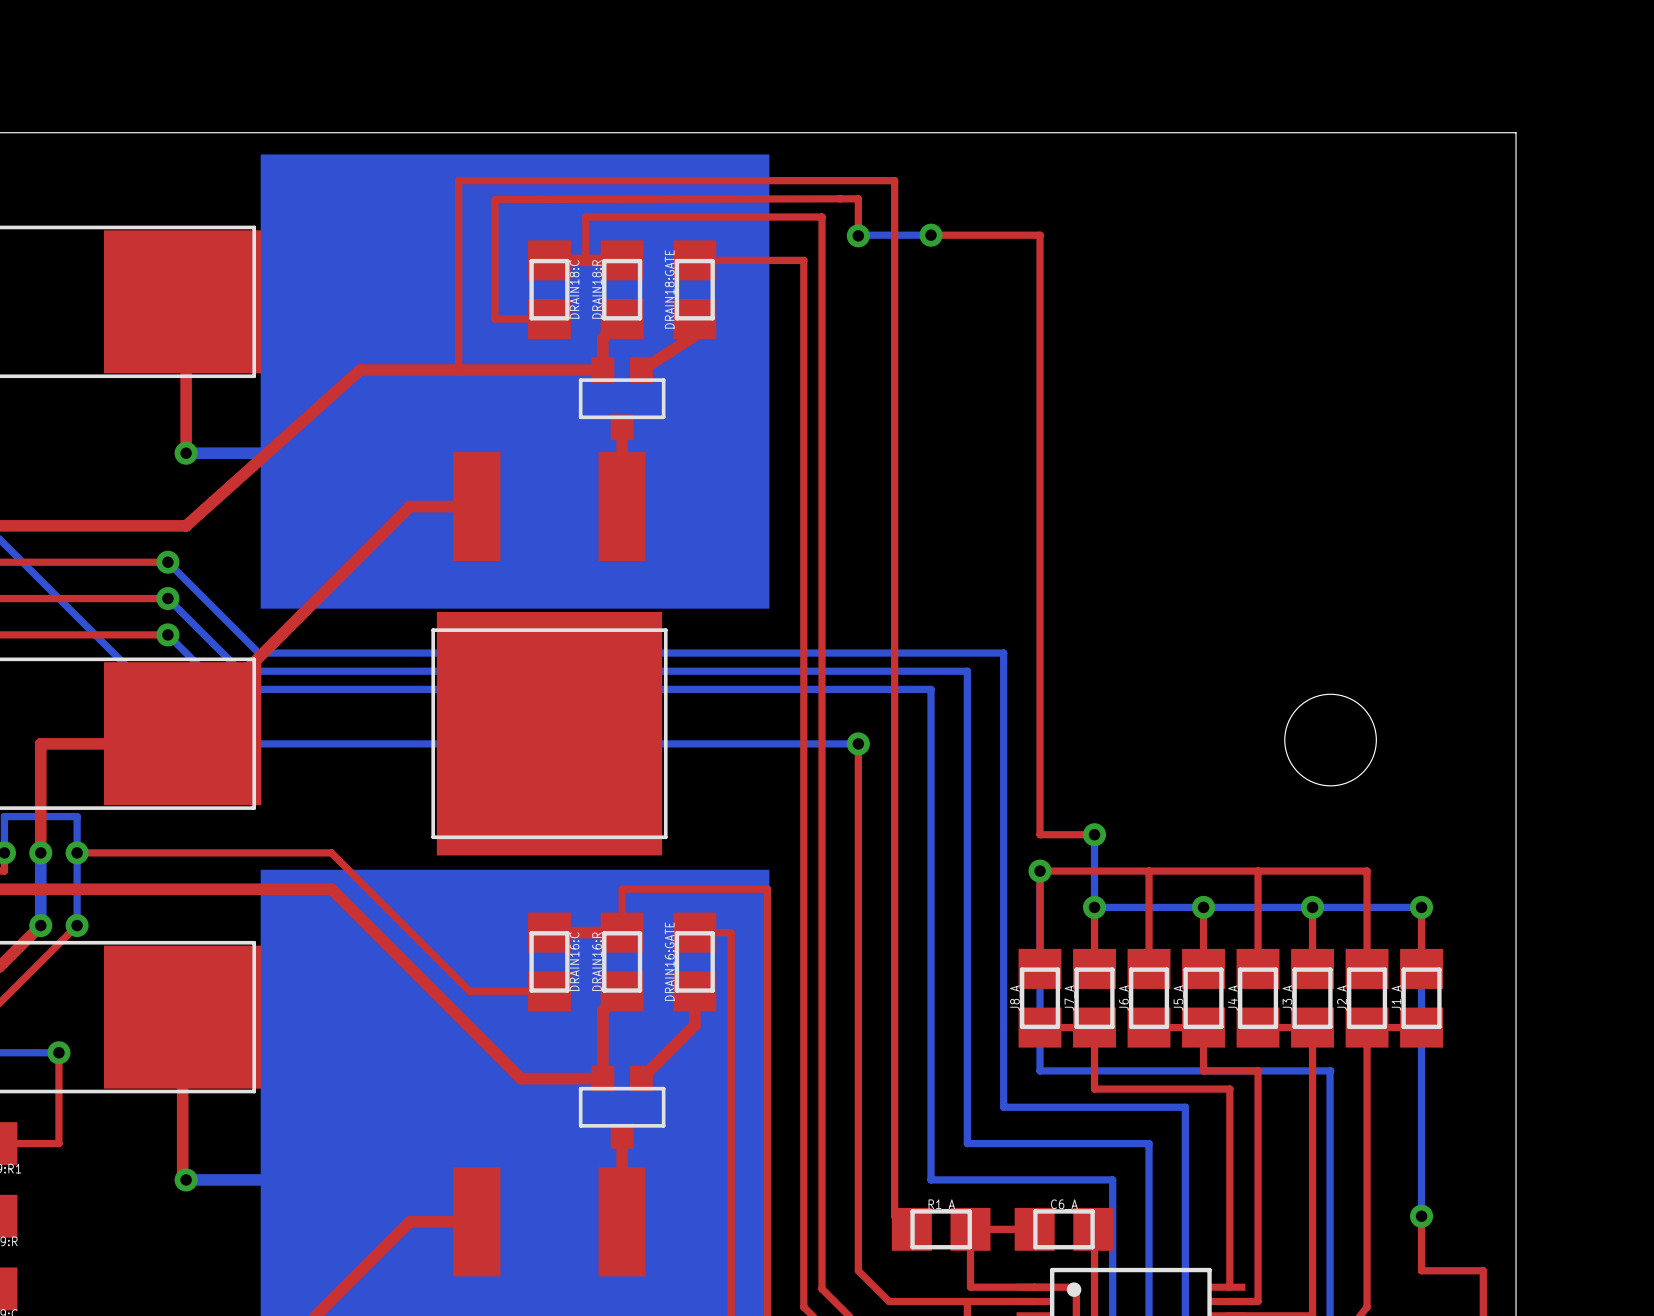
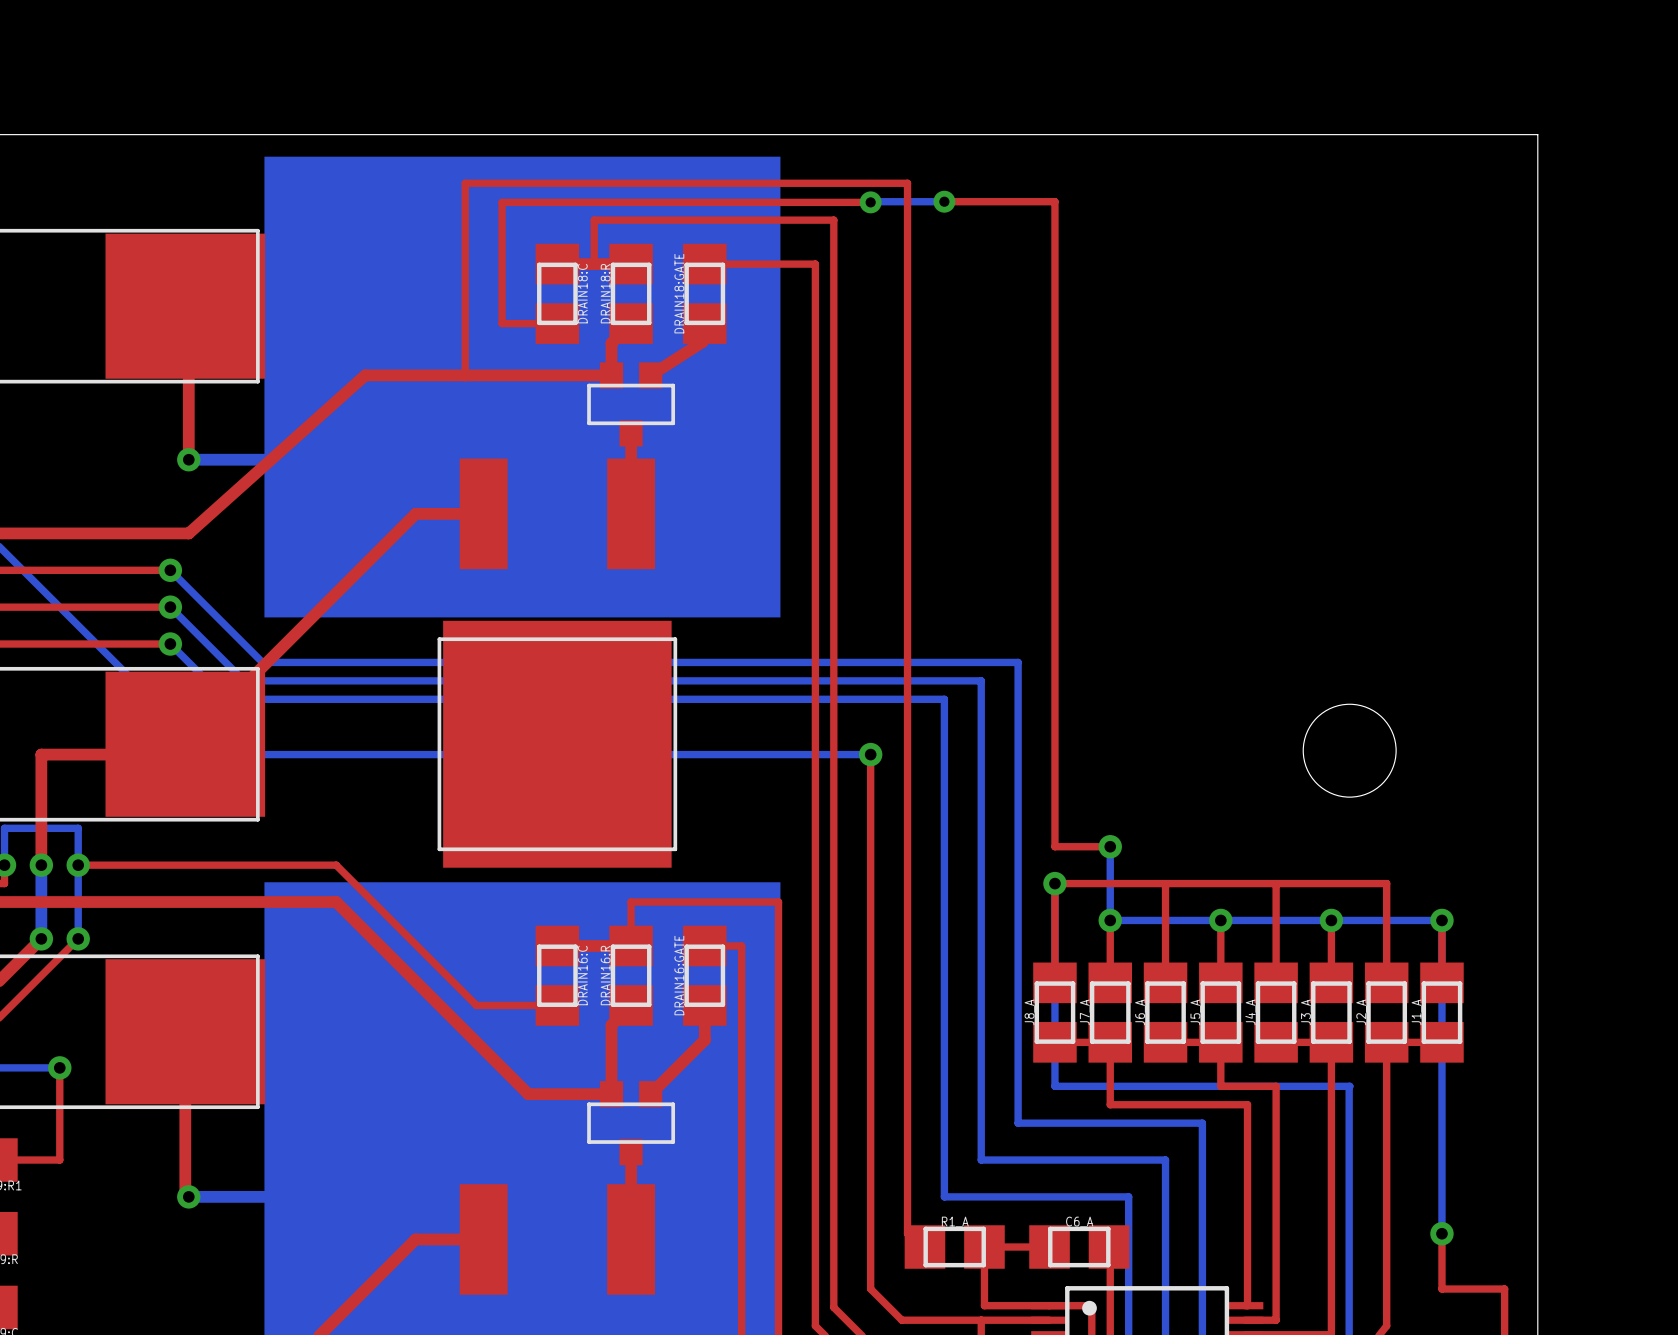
via: none -> (944, 201)
top track: (494, 199) (858, 198) (858, 235) -> (502, 202) (870, 202)
via: none -> (870, 202)
via: (858, 235) -> none
top track: (931, 235) (1040, 235) -> (944, 201) (1054, 201) (1054, 238)
bottom track: (931, 235) (858, 235) -> (944, 201) (870, 202)
via: (931, 235) -> none

